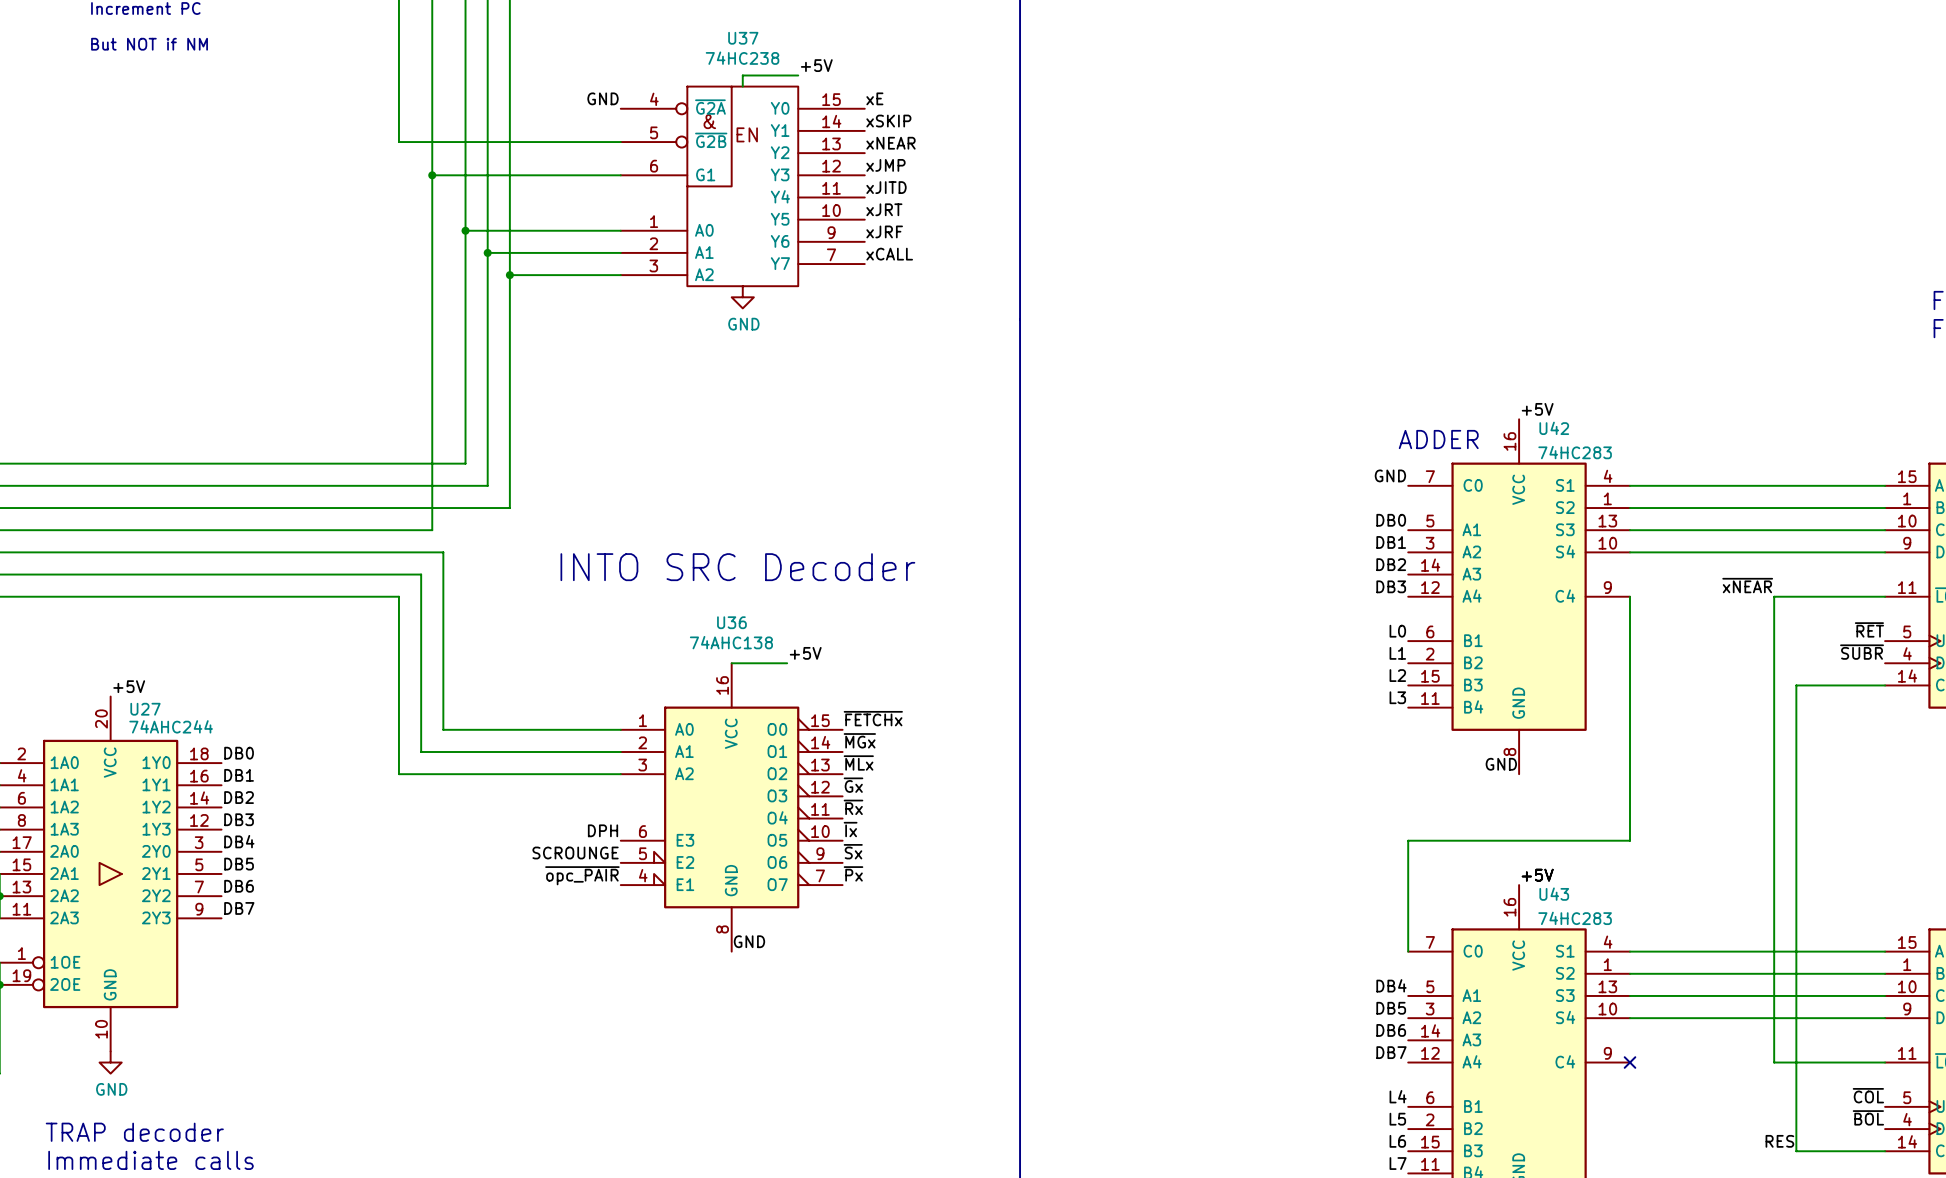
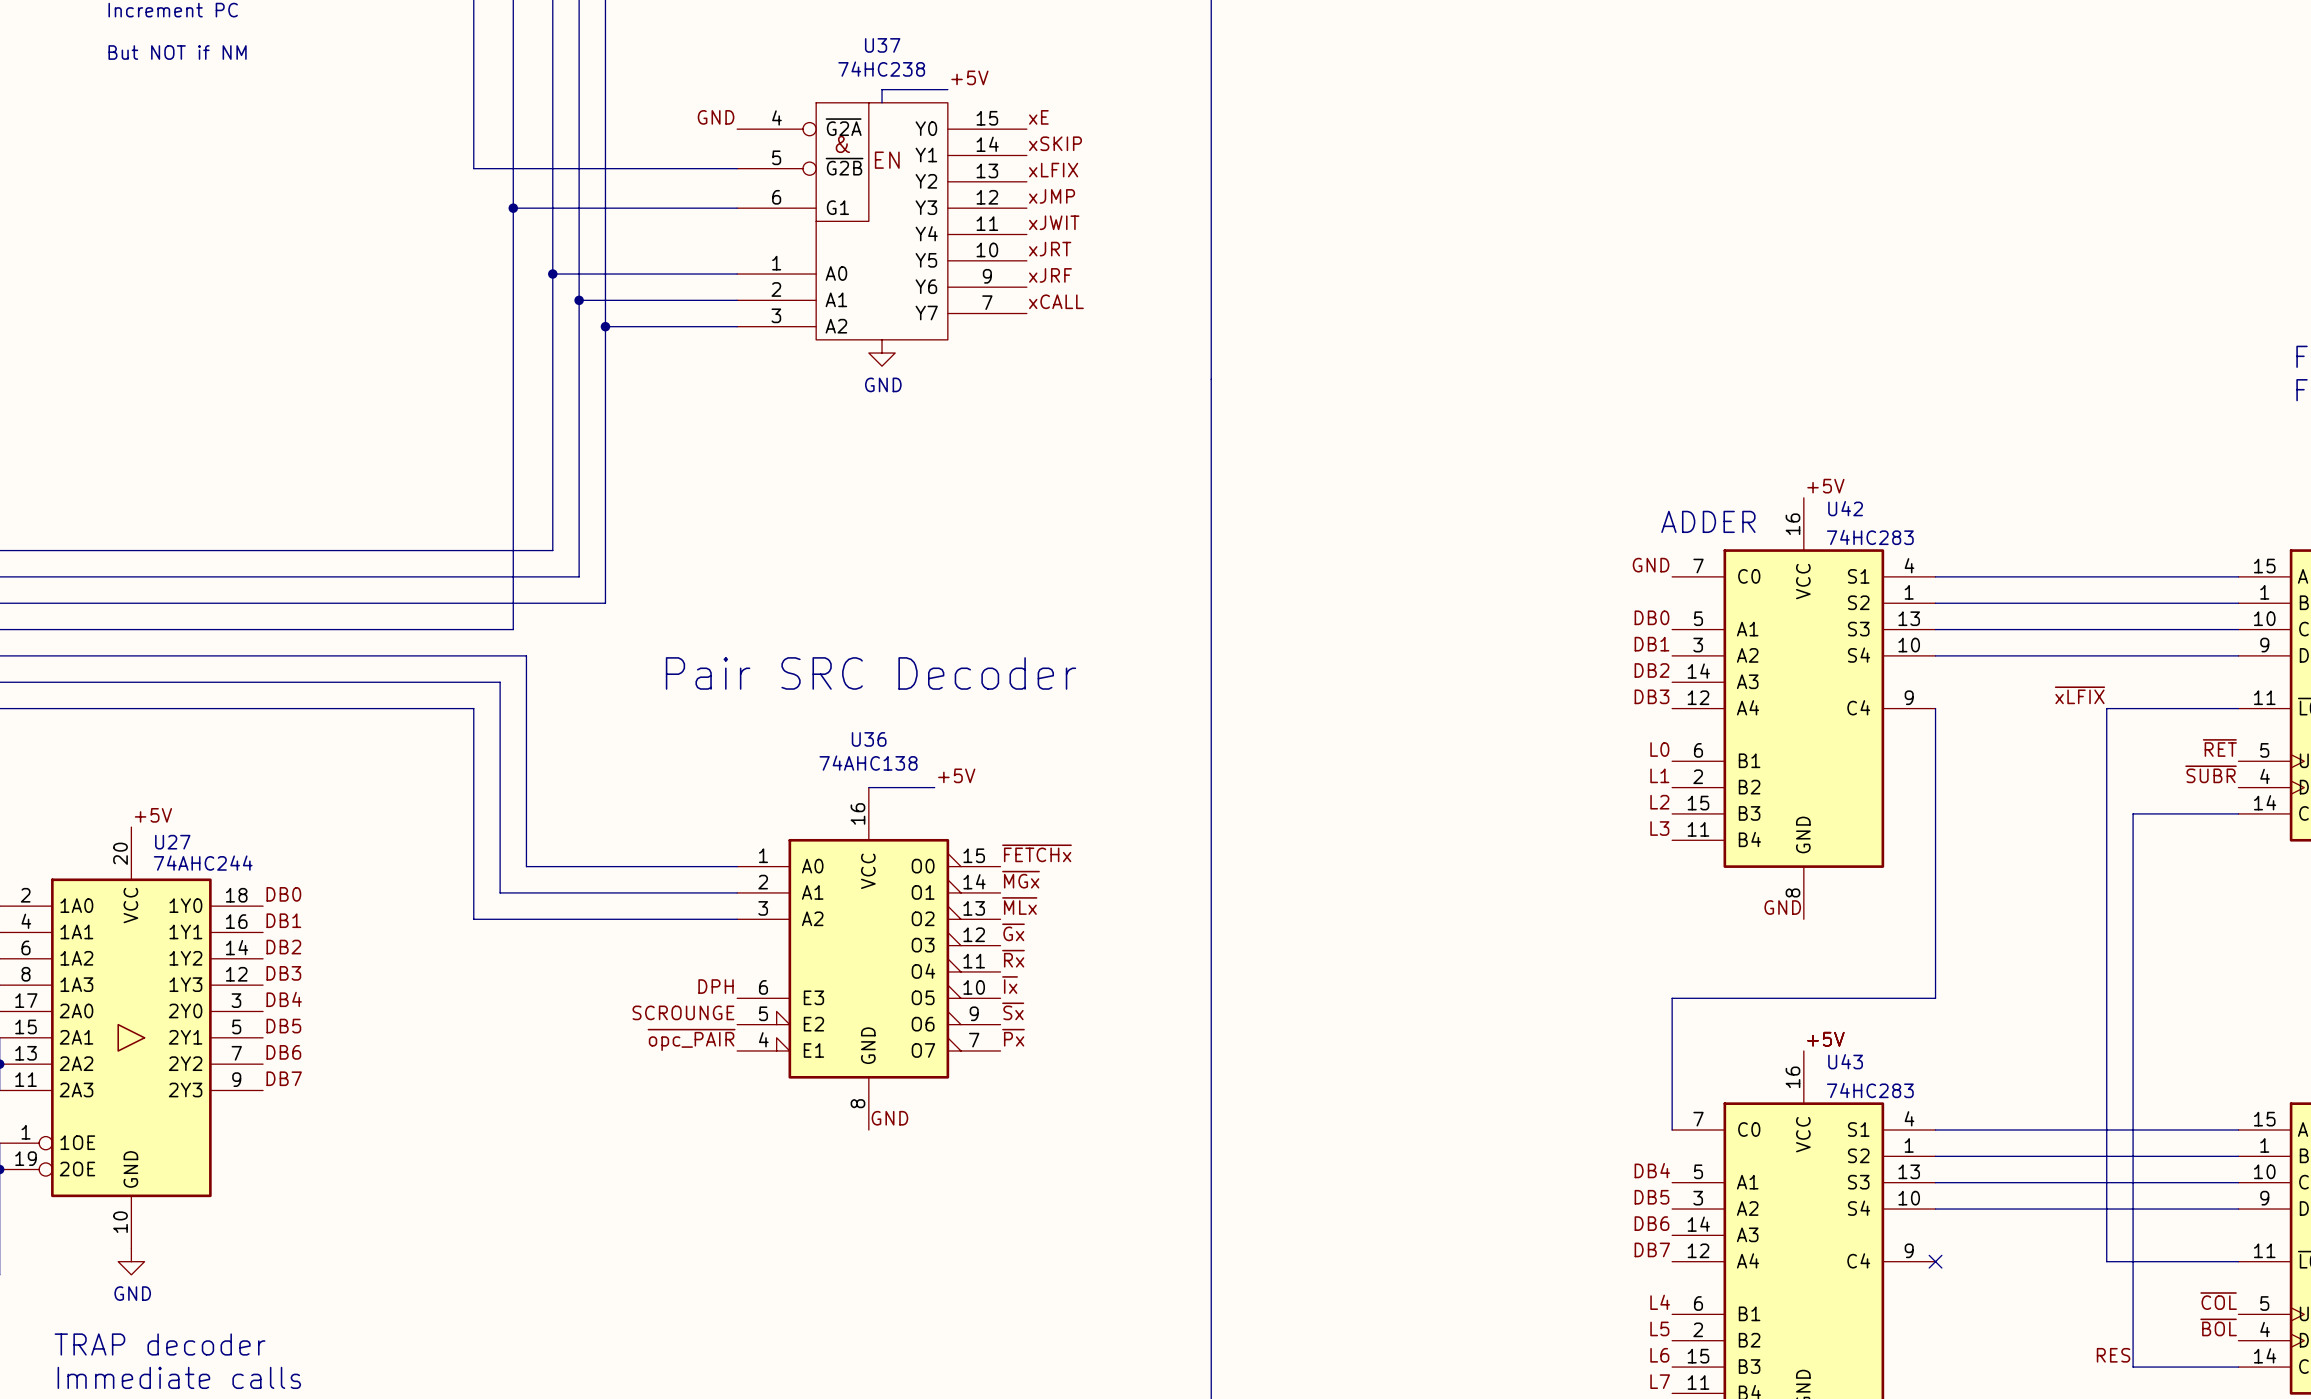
label: xNEAR (890, 143) -> xLFIX (1053, 170)
label: xJITD (886, 187) -> xJWIT (1054, 222)
text: INTO SRC Decoder (737, 567) -> Pair SRC Decoder (871, 673)
label: ~{xNEAR} (1747, 585) -> ~{xLFIX} (2079, 695)

